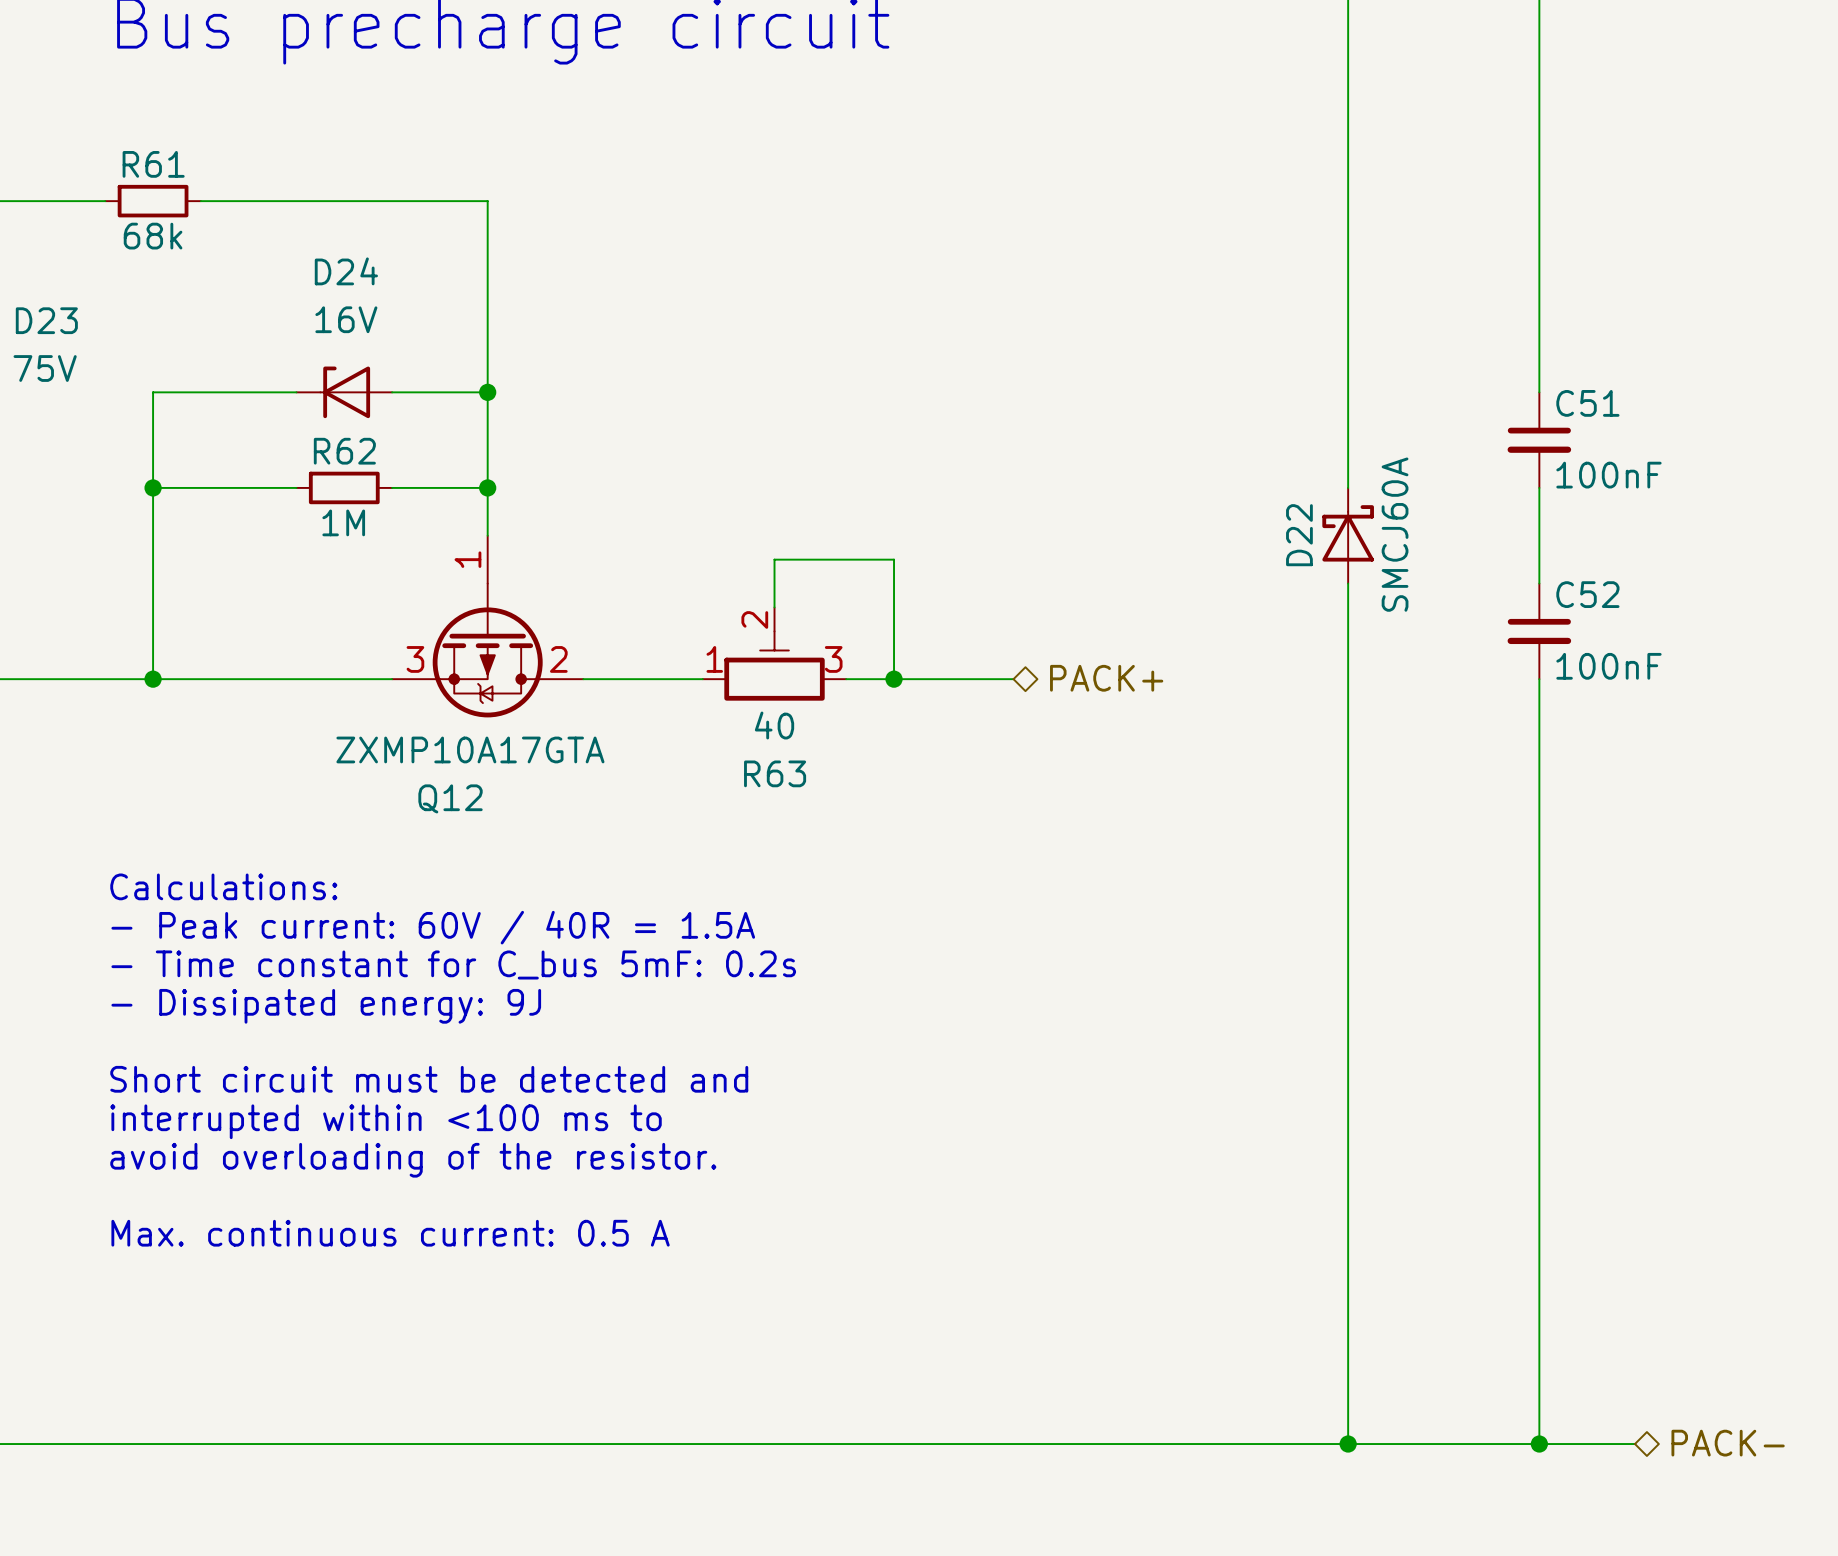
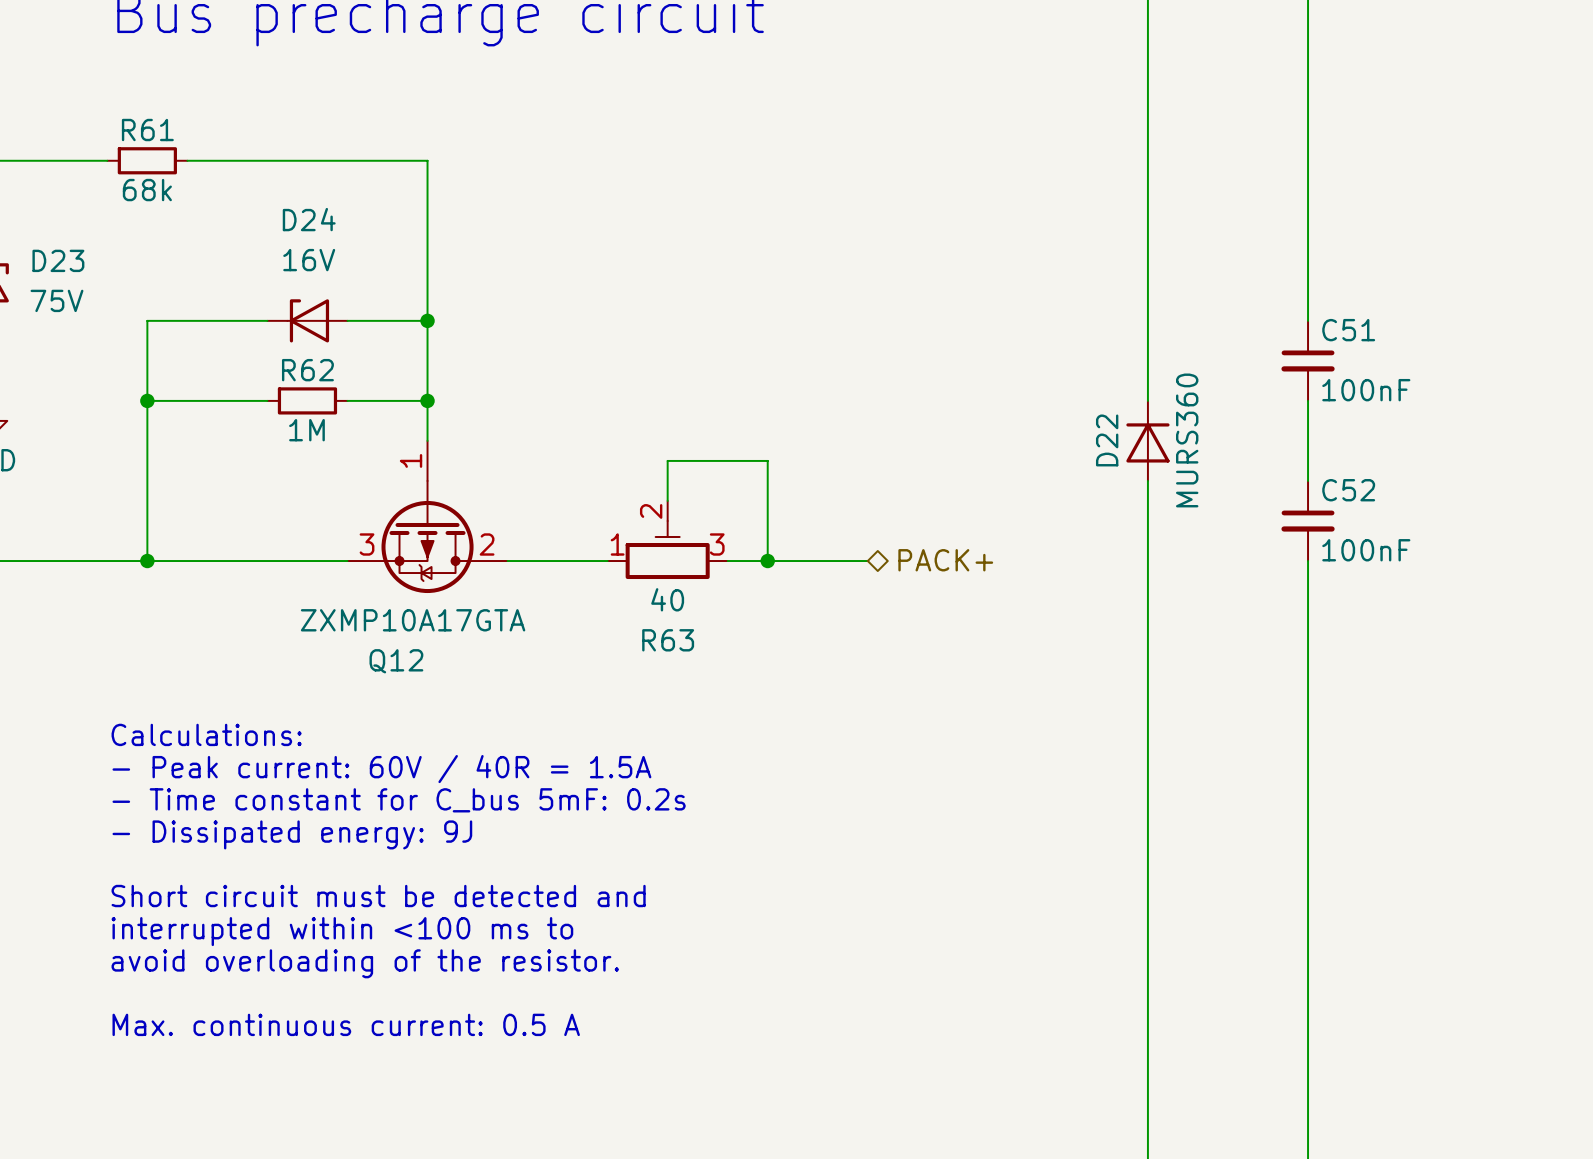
D22 symbol: [1322, 487, 1374, 584] -> [1126, 400, 1170, 481]
D22 value: SMCJ60A (1395, 534) -> MURS360 (1187, 440)

